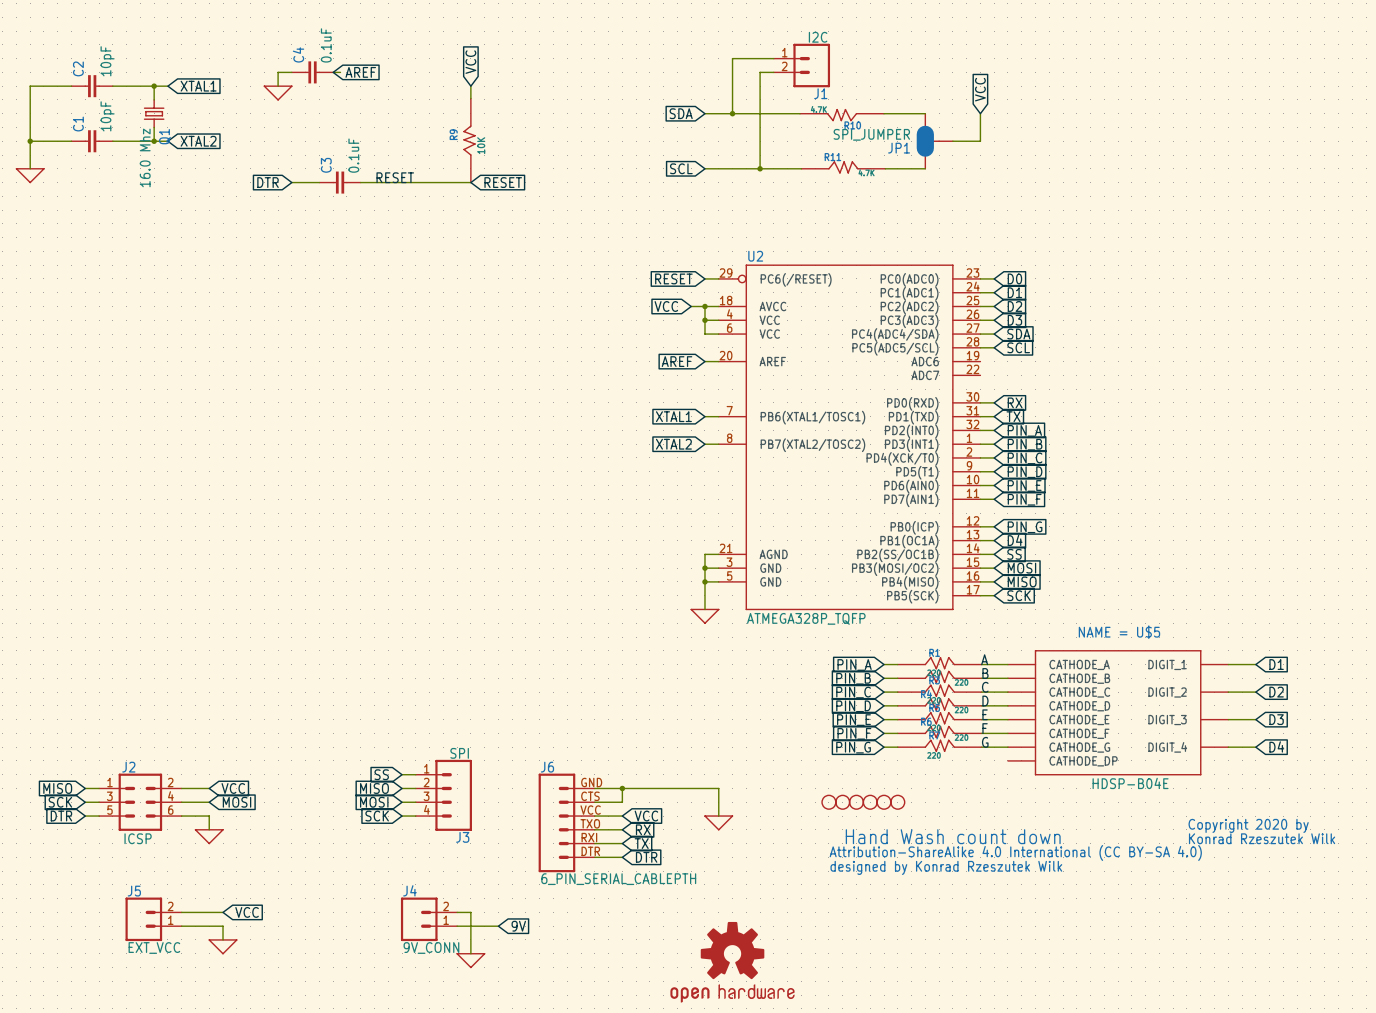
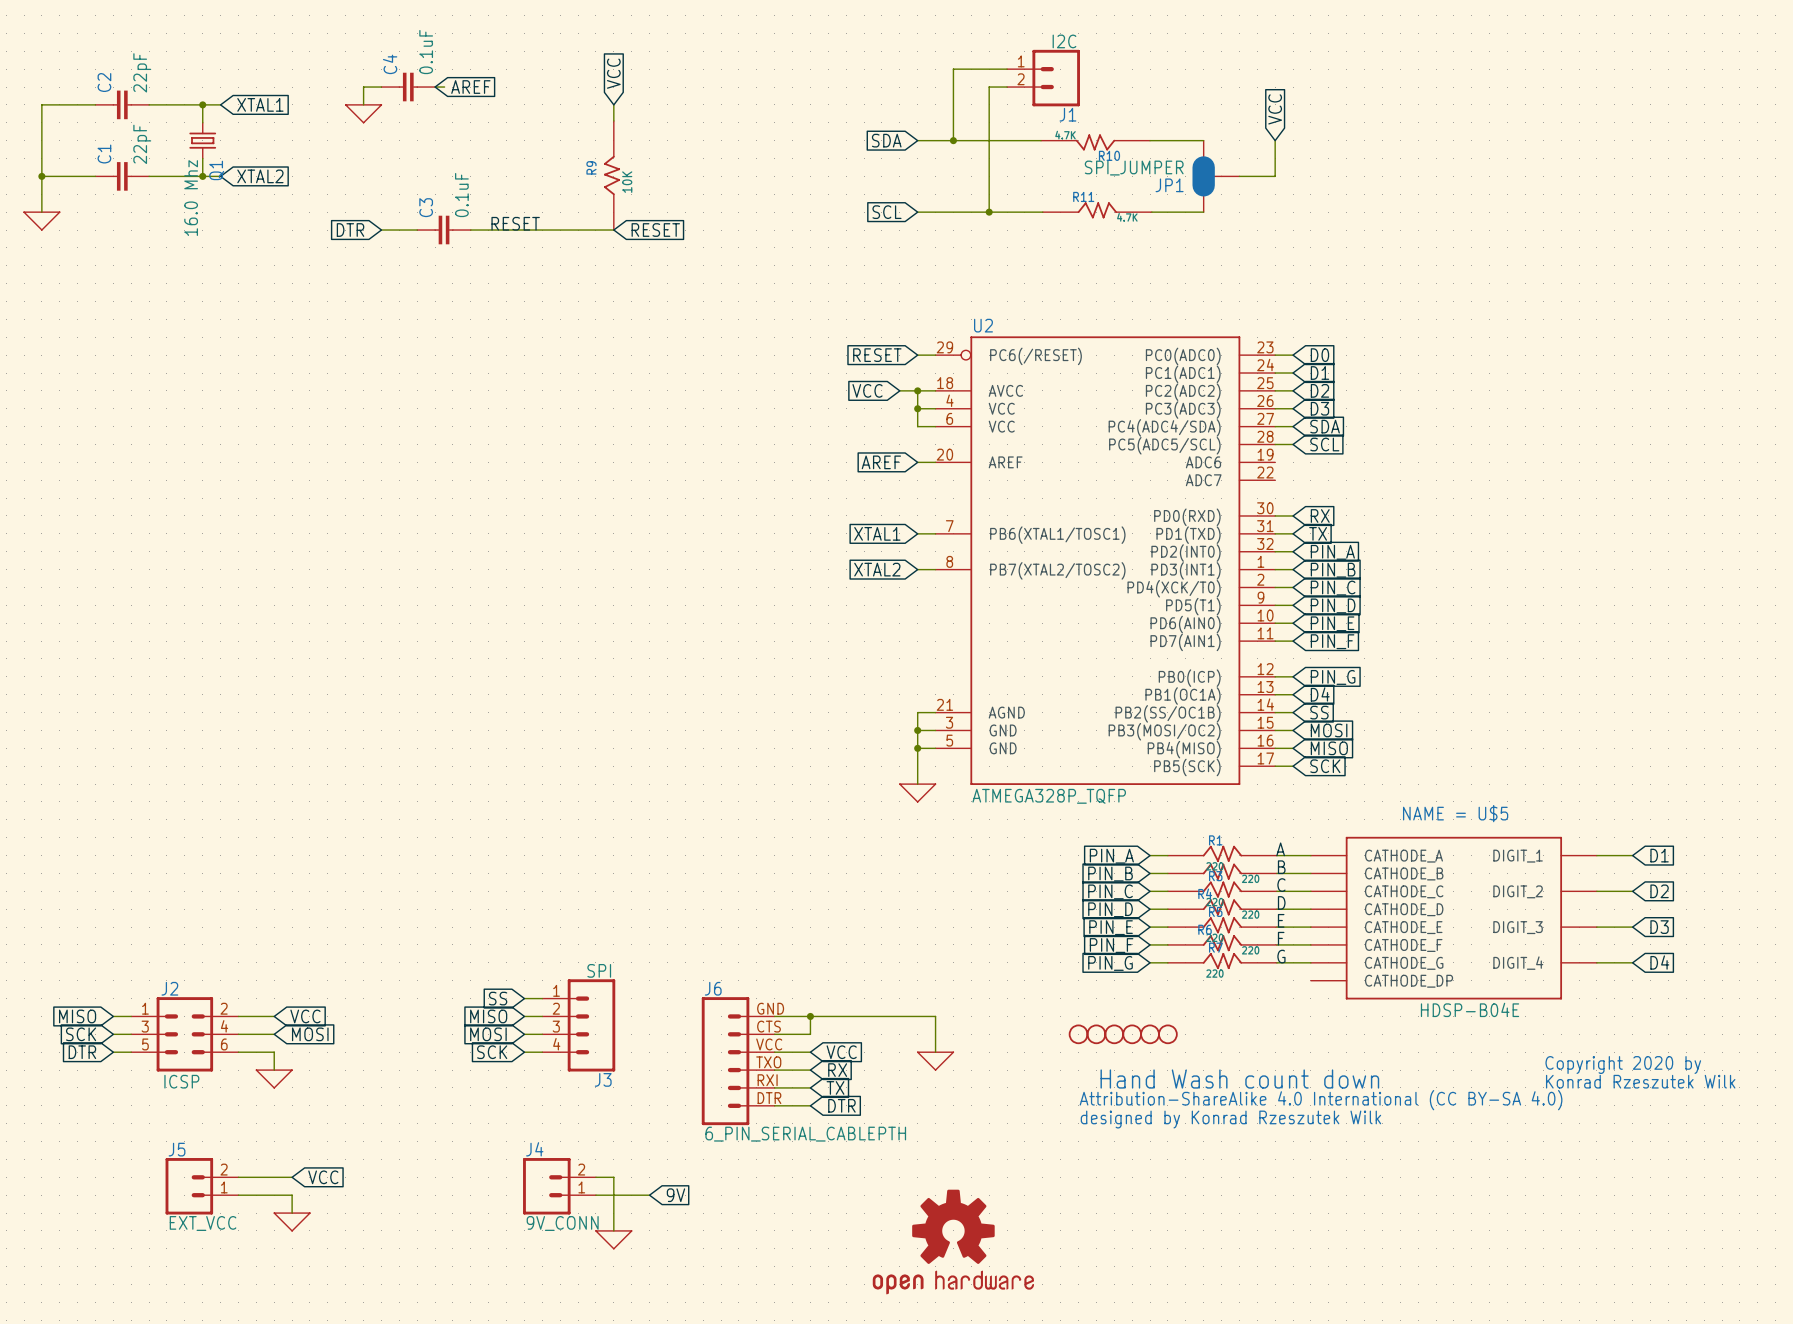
C2 value: 10pF (107, 61) -> 22pF (142, 72)
C1 value: 10pF (107, 116) -> 22pF (142, 144)

